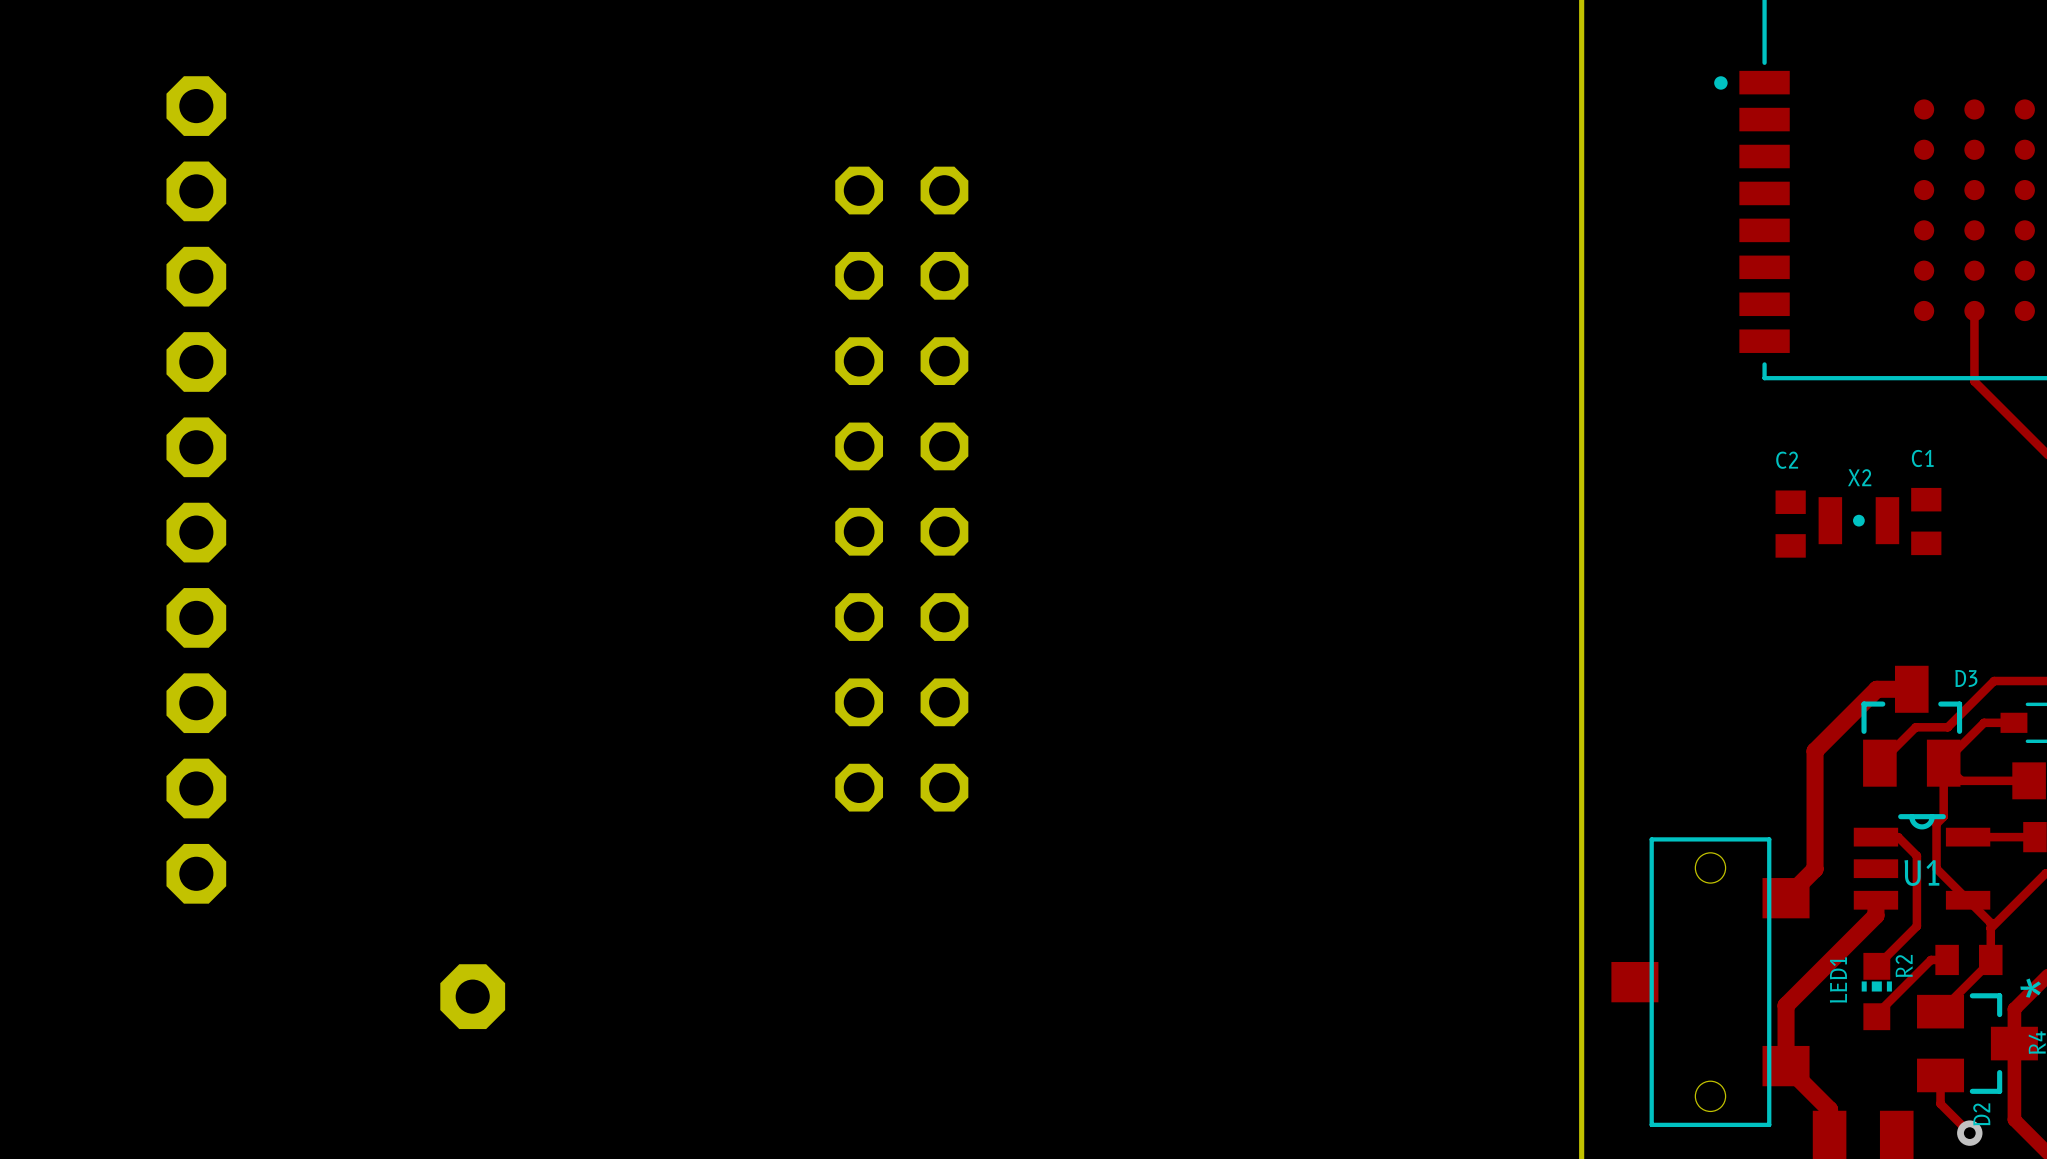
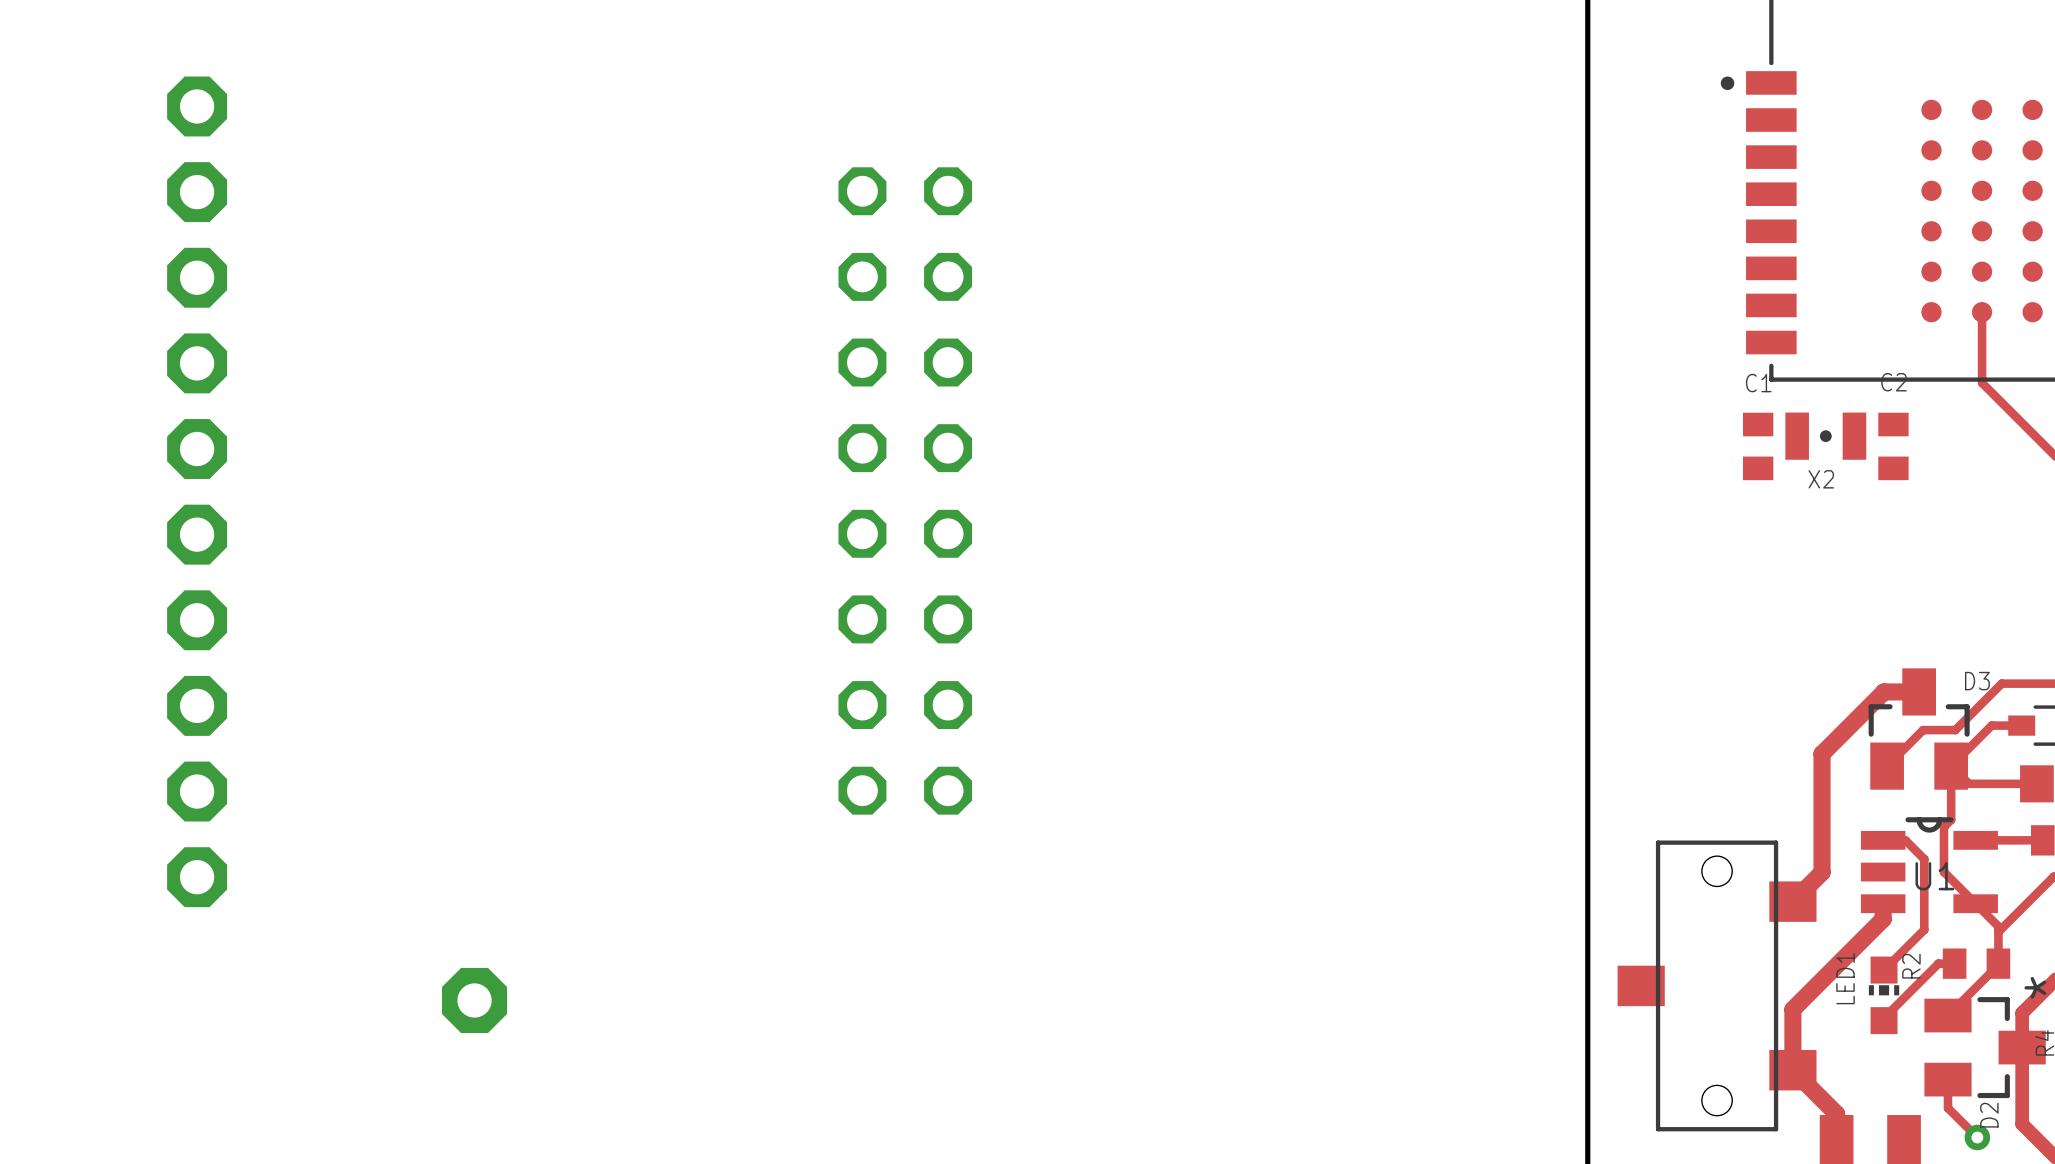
X2 name position: X2 (1859, 477) -> X2 (1821, 479)
X2 position: (1858, 520) -> (1825, 436)
C1 position: (1926, 521) -> (1758, 446)
C2 position: (1790, 524) -> (1893, 446)

